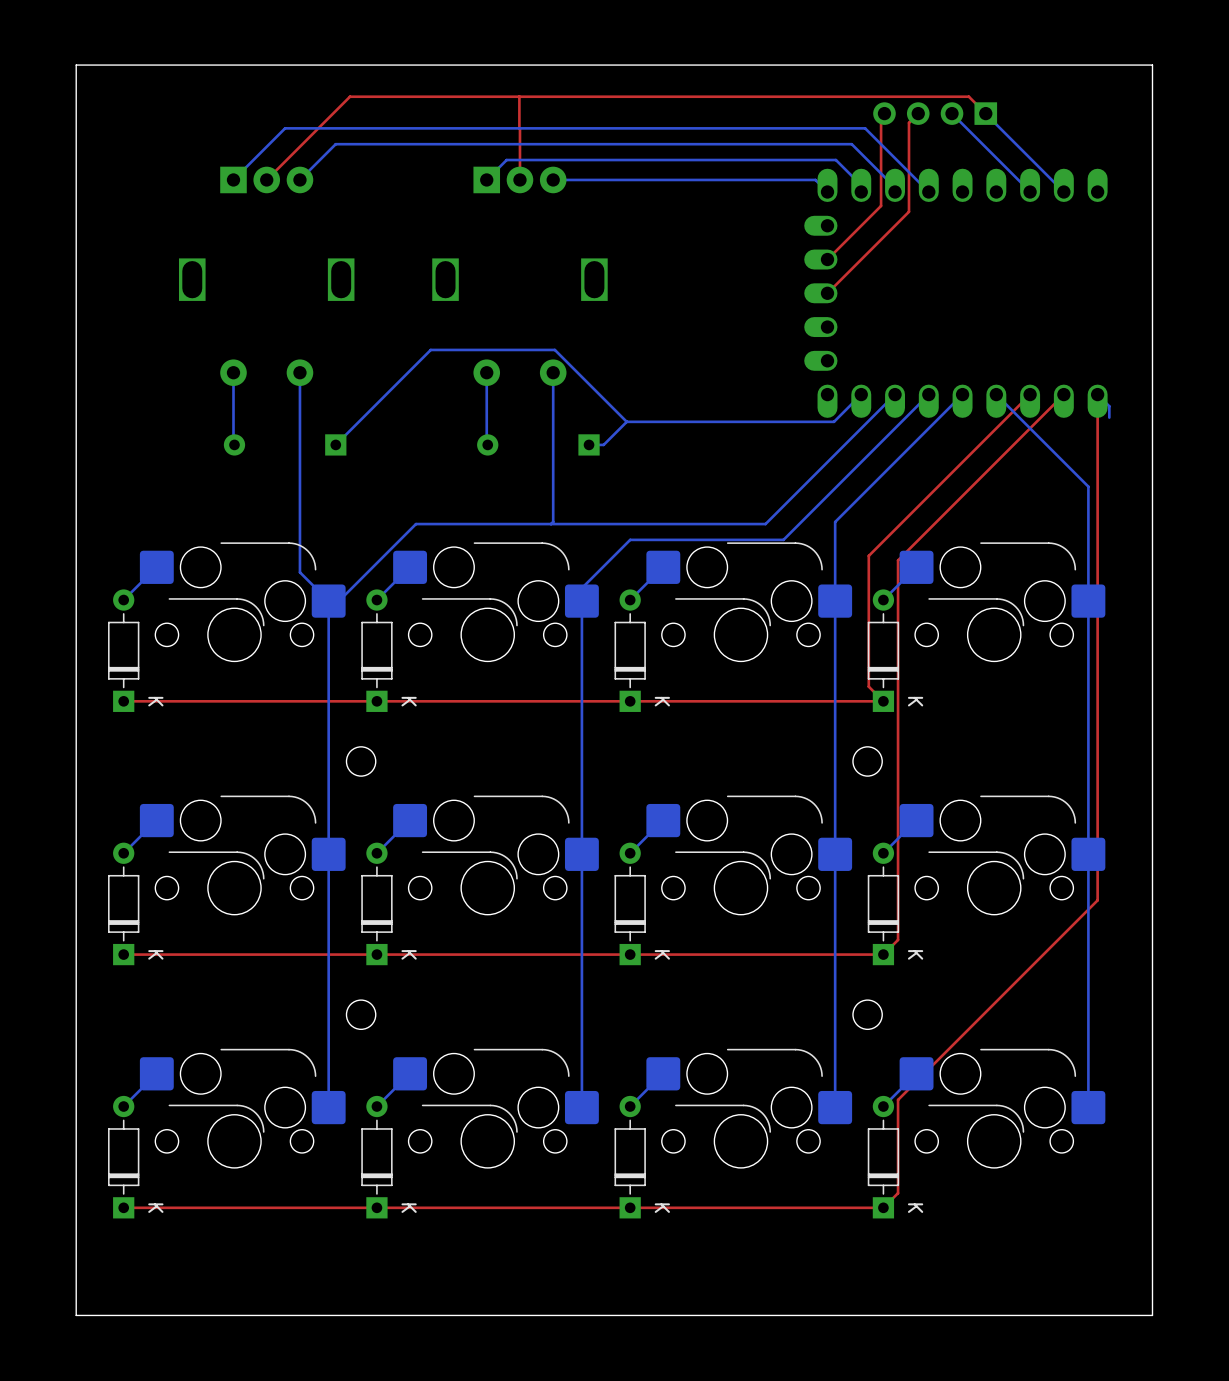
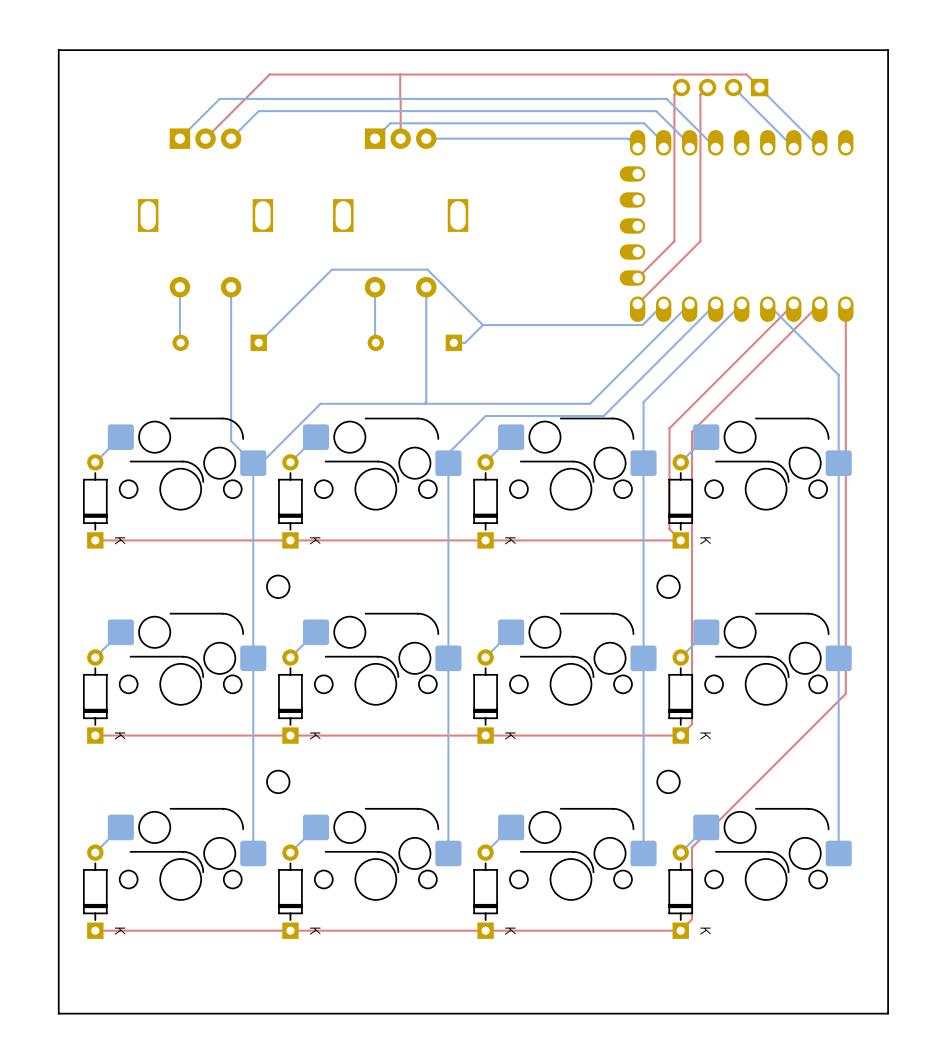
top track: (881, 117) (881, 205) (827, 259) -> (678, 90) (674, 94) (674, 241) (637, 278)
top track: (908, 211) (827, 293) -> (700, 163) (700, 241) (637, 304)
bottom track: (1097, 394) (1109, 406) (1109, 417) -> none

